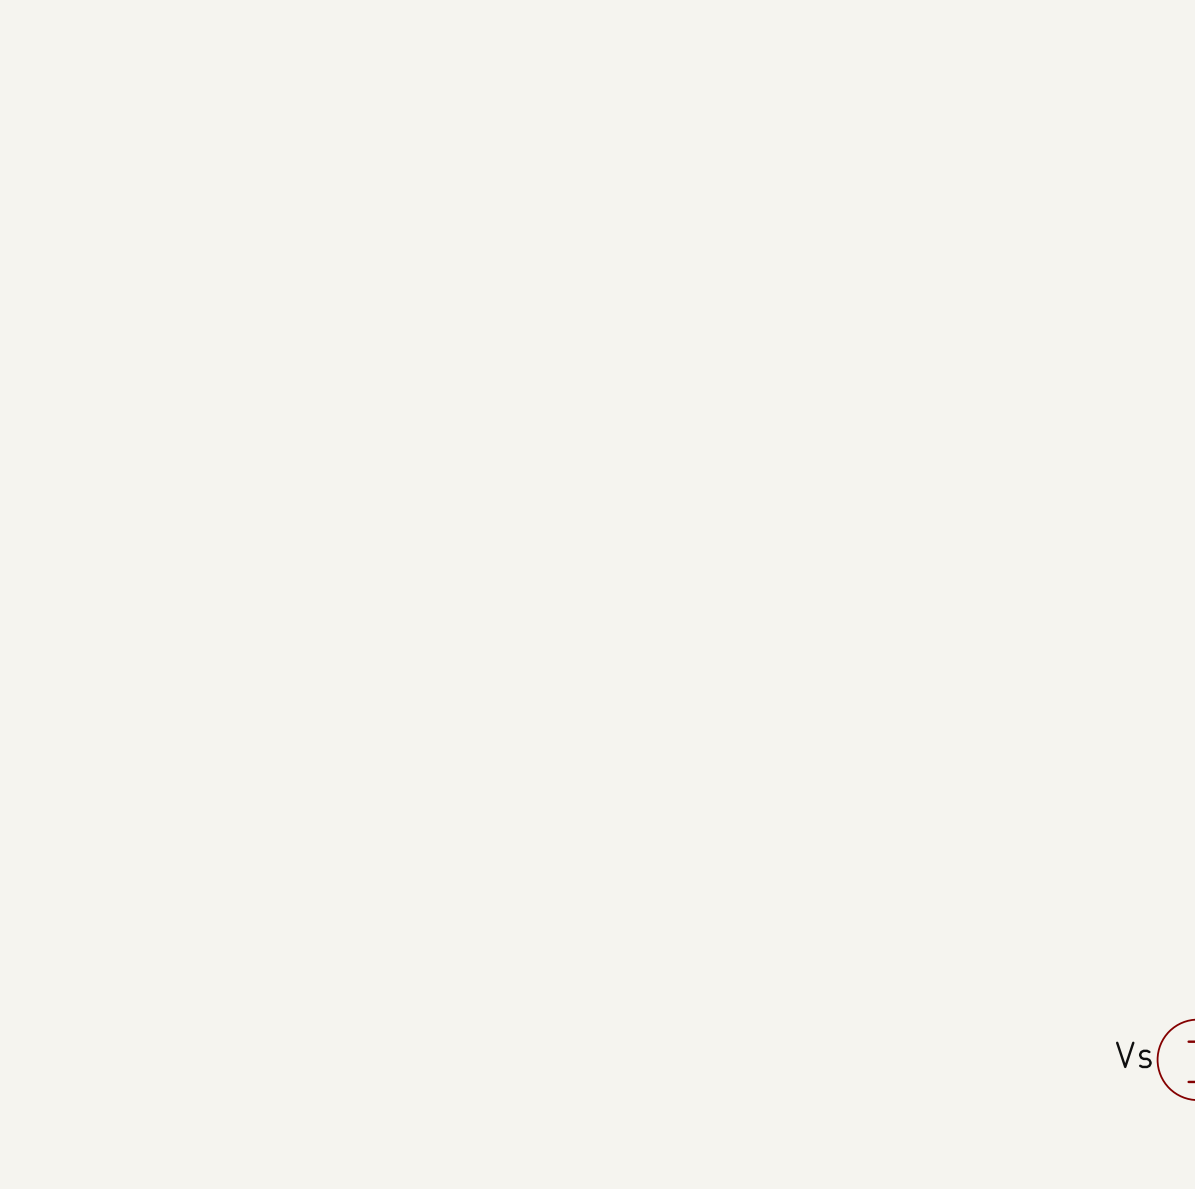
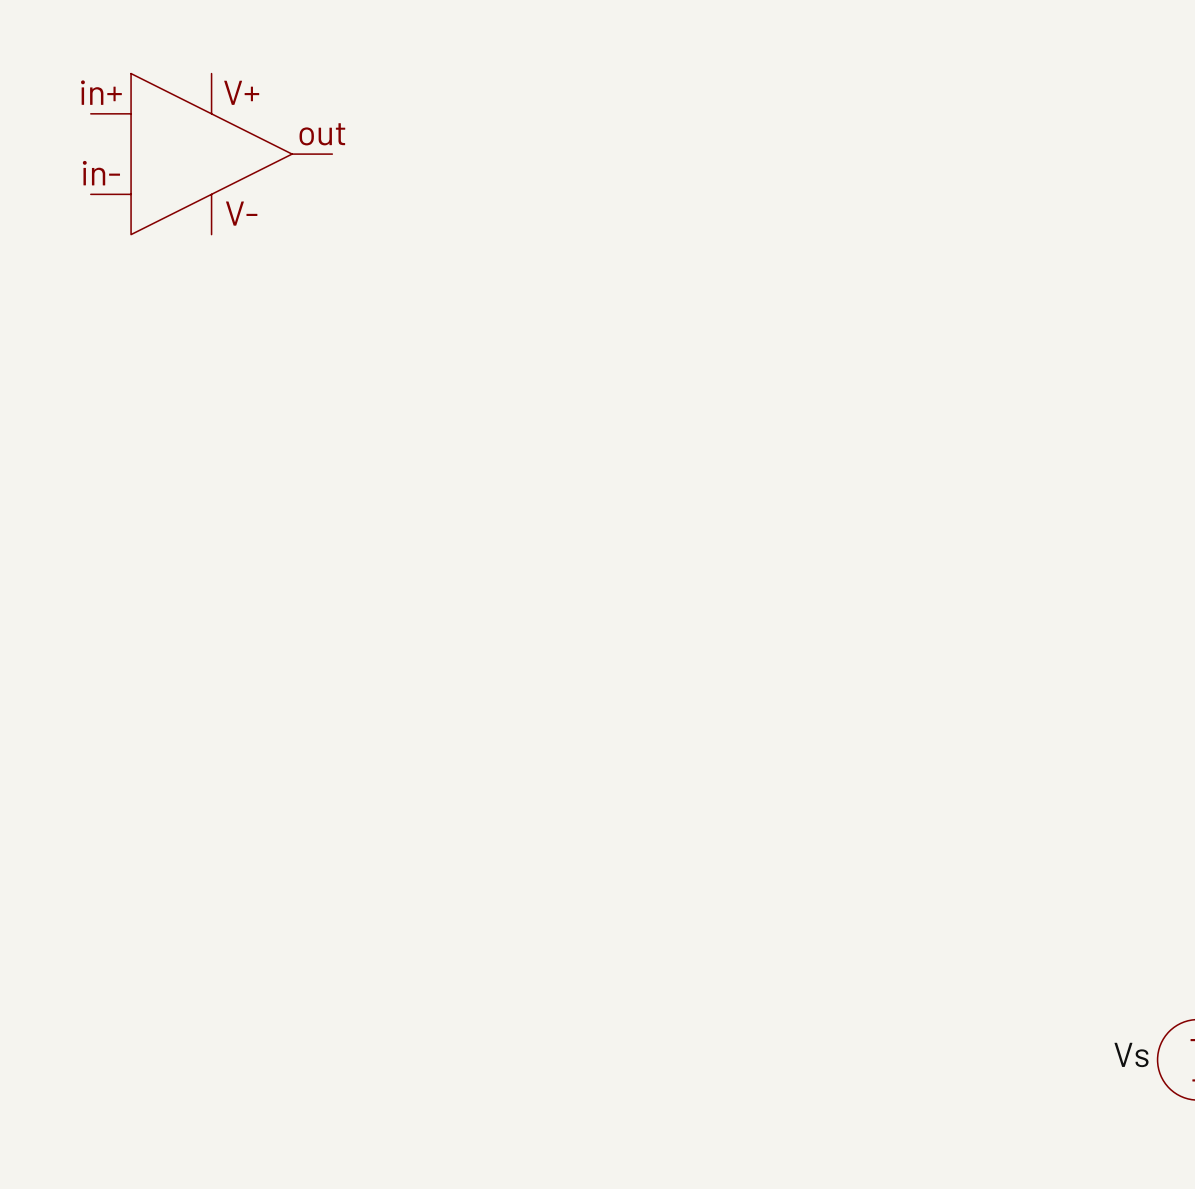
part: none -> (211, 154)

